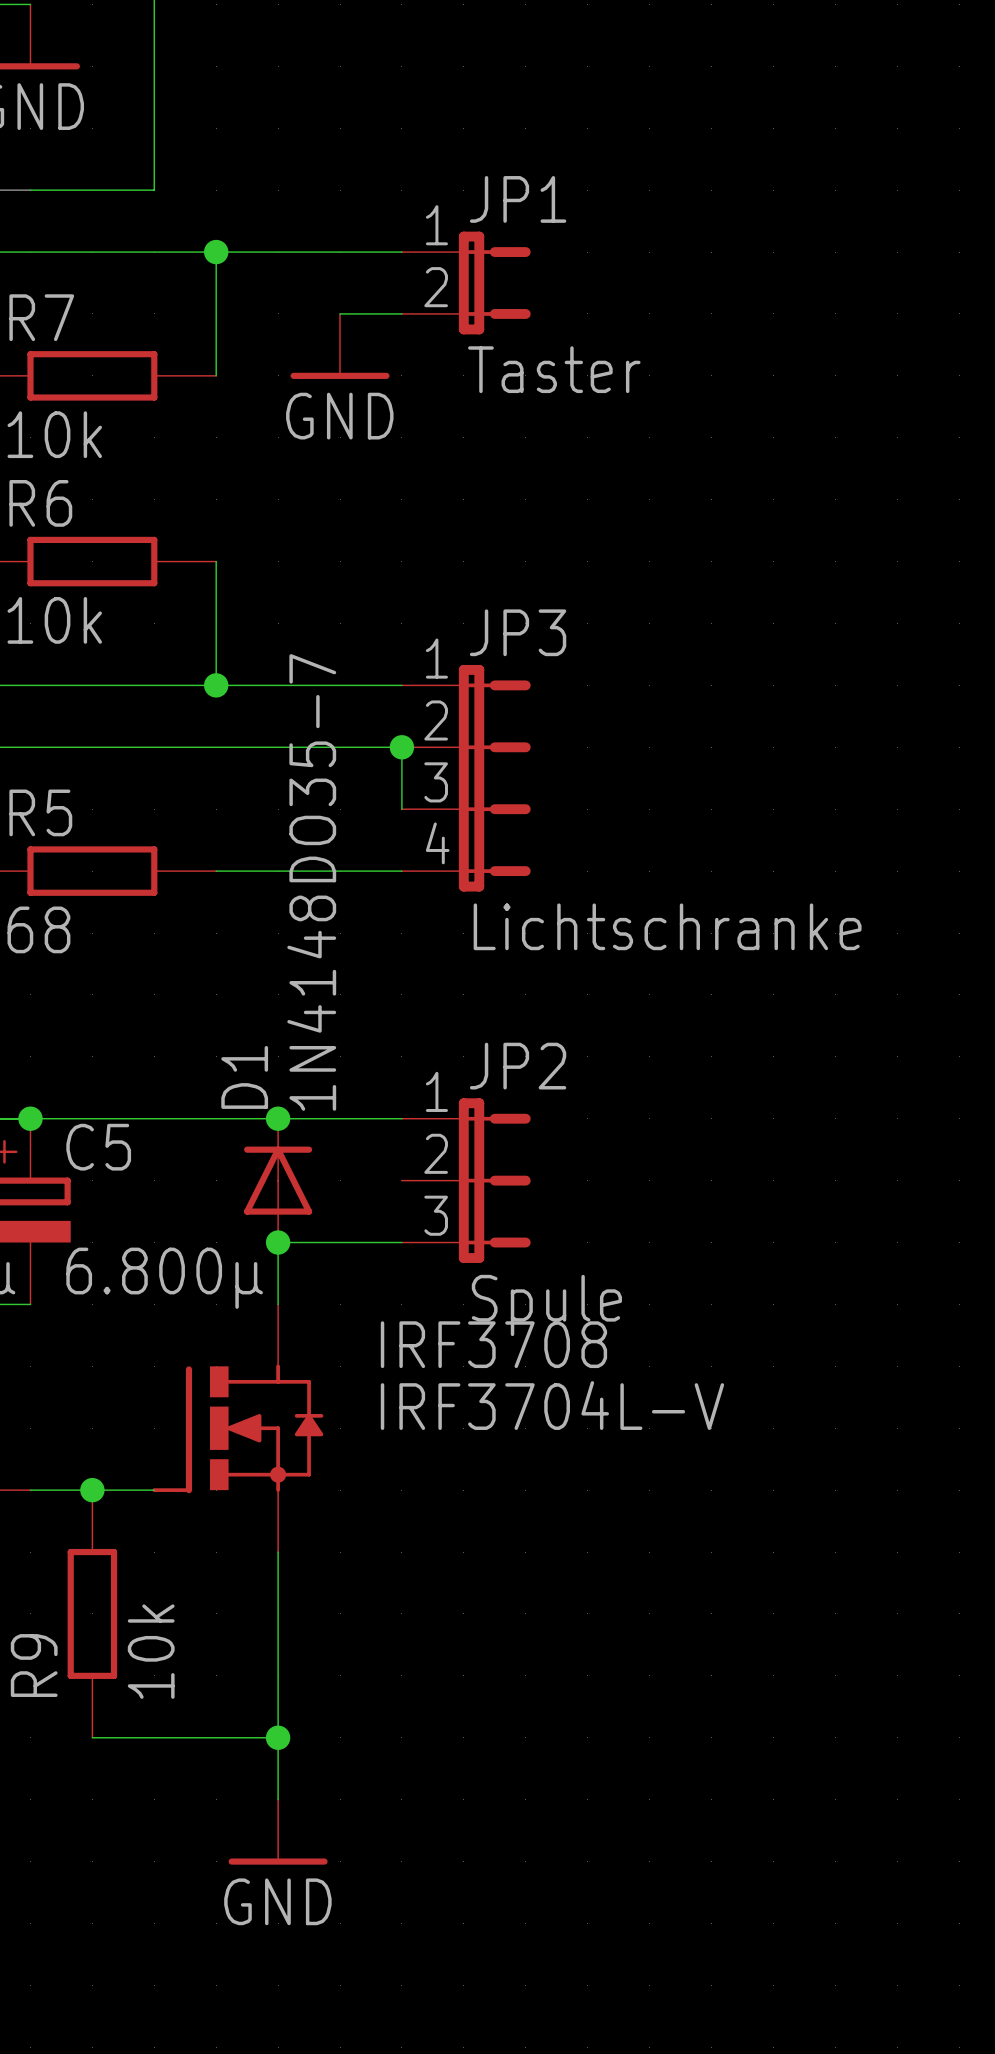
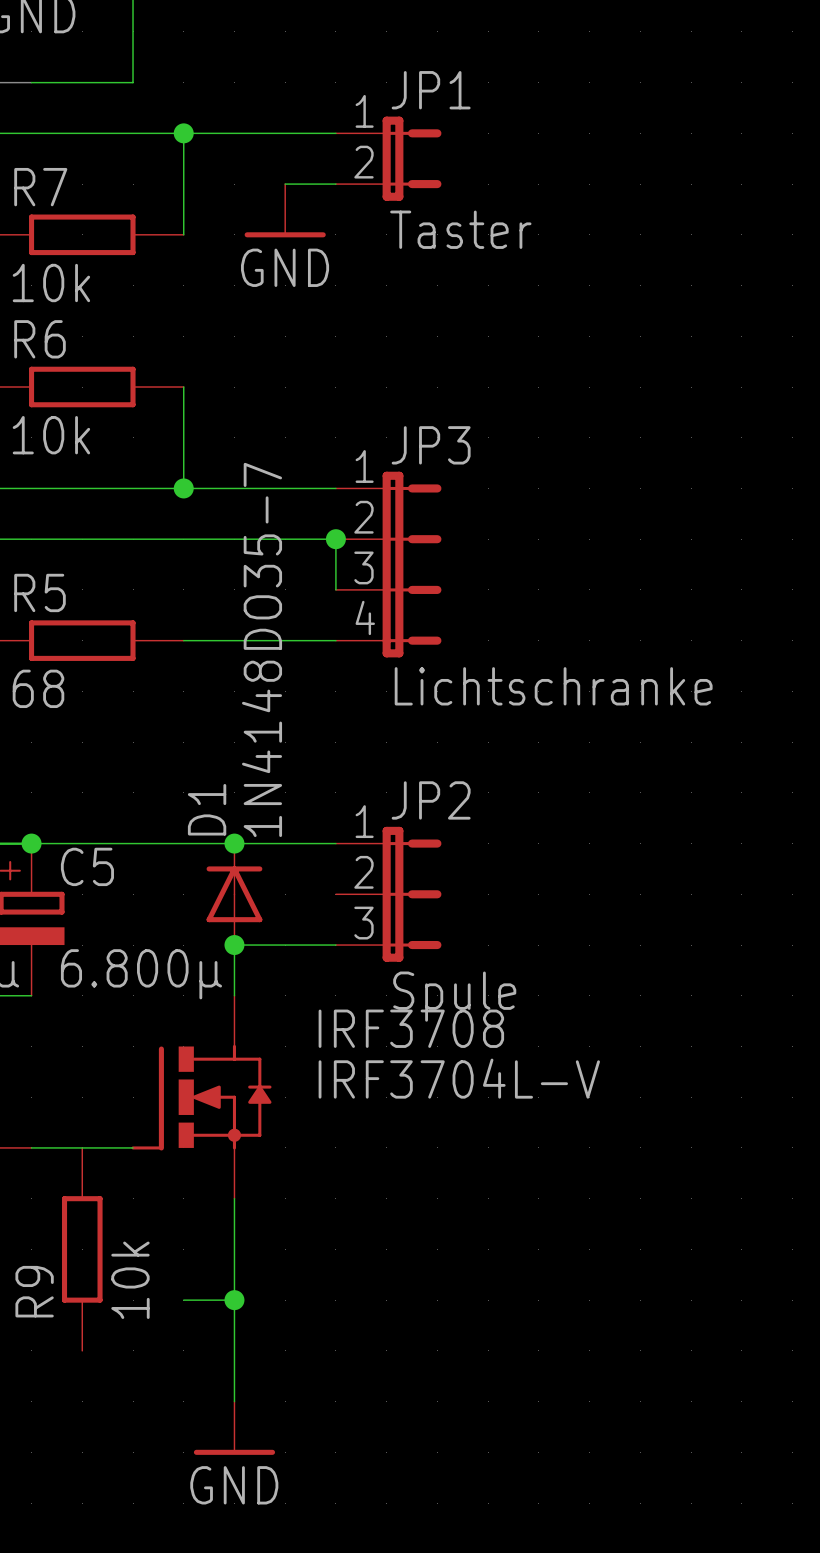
junction: (92, 1490) -> none
wire: none -> (183, 1300) (234, 1300)
wire: (92, 1737) (278, 1737) -> none
junction position: (278, 1737) -> (234, 1300)

